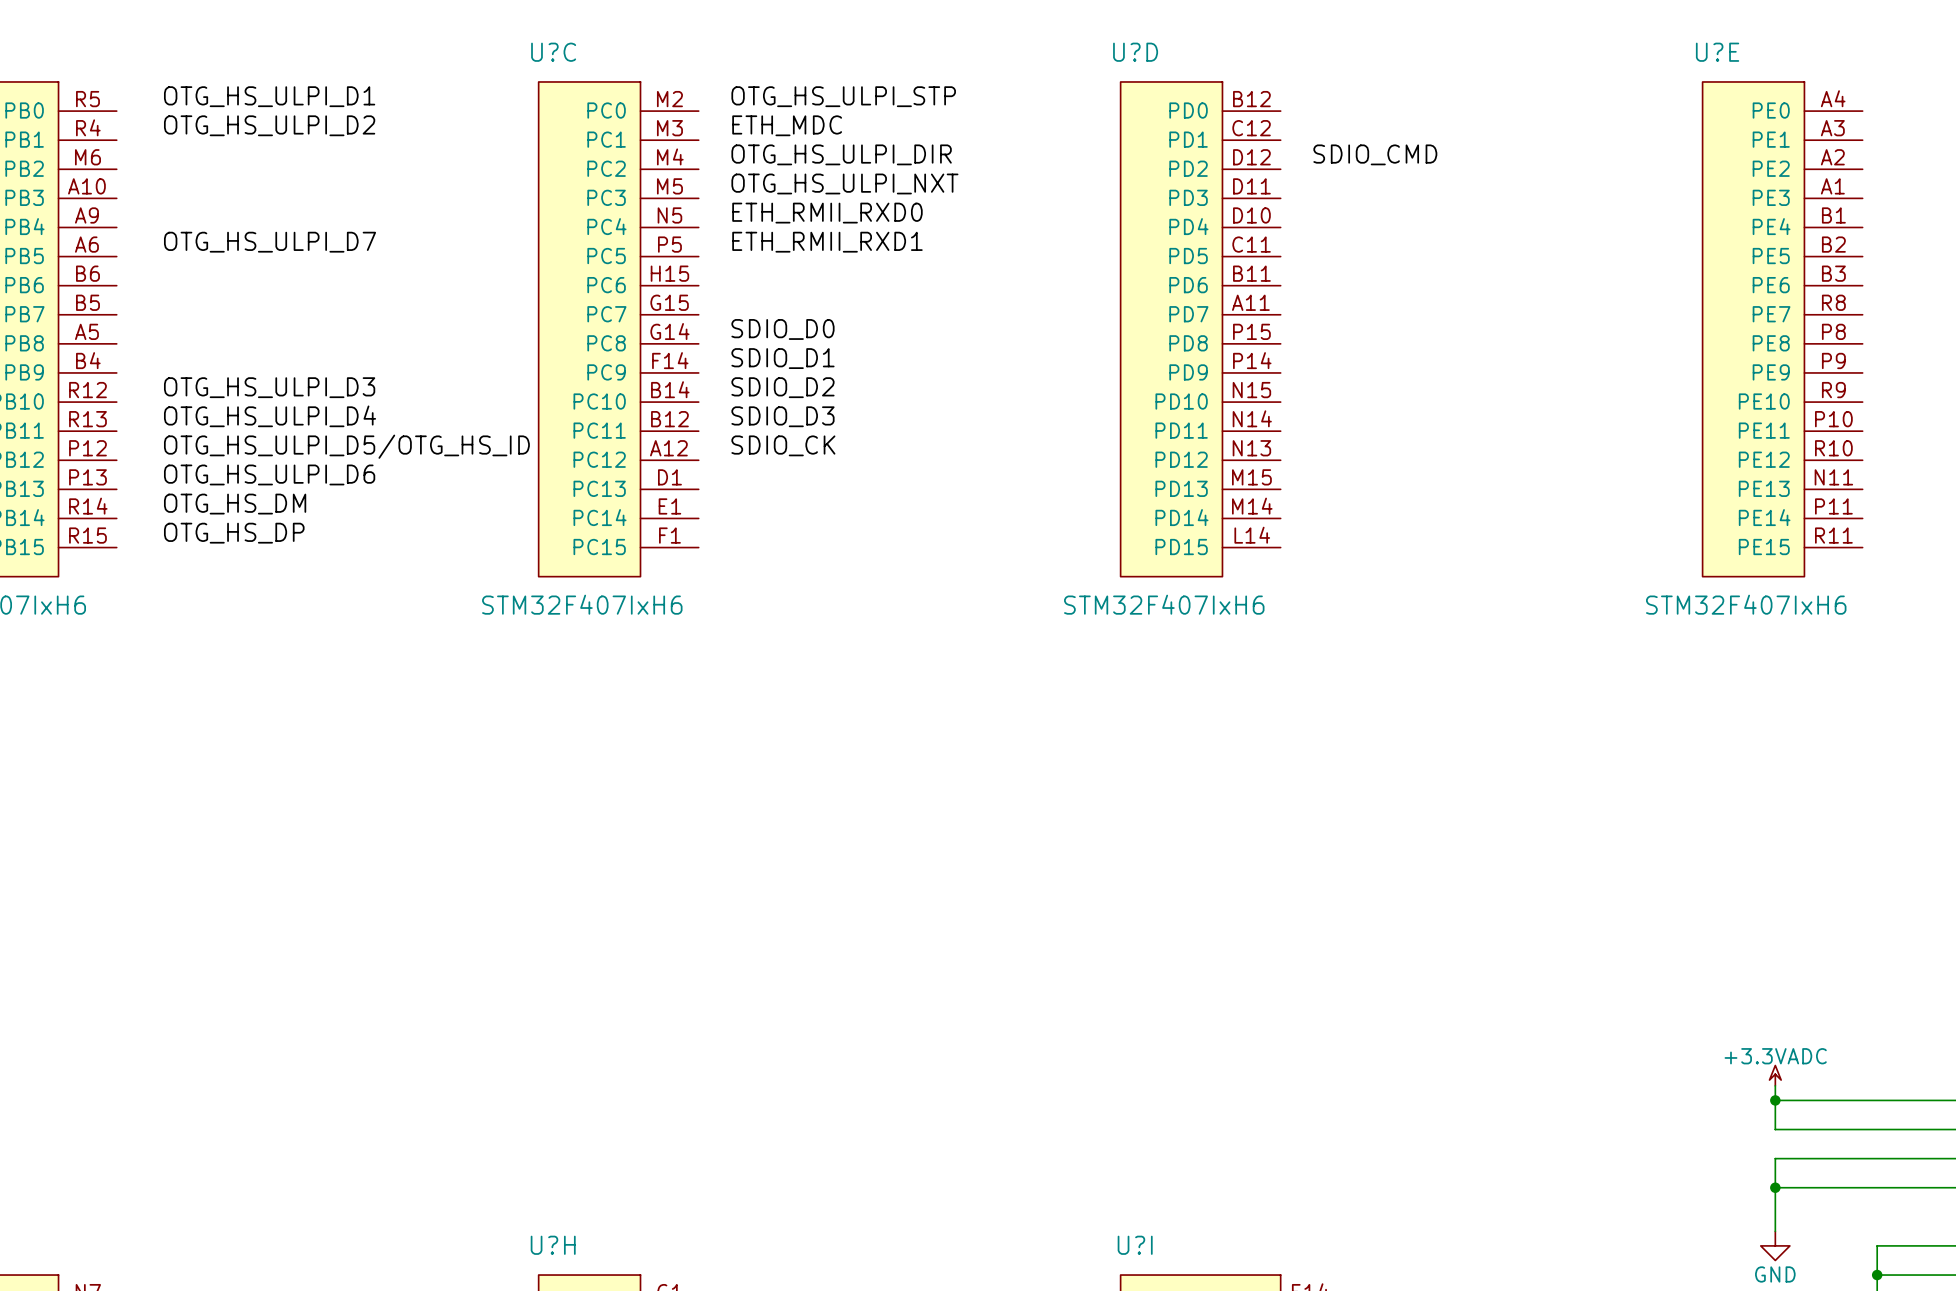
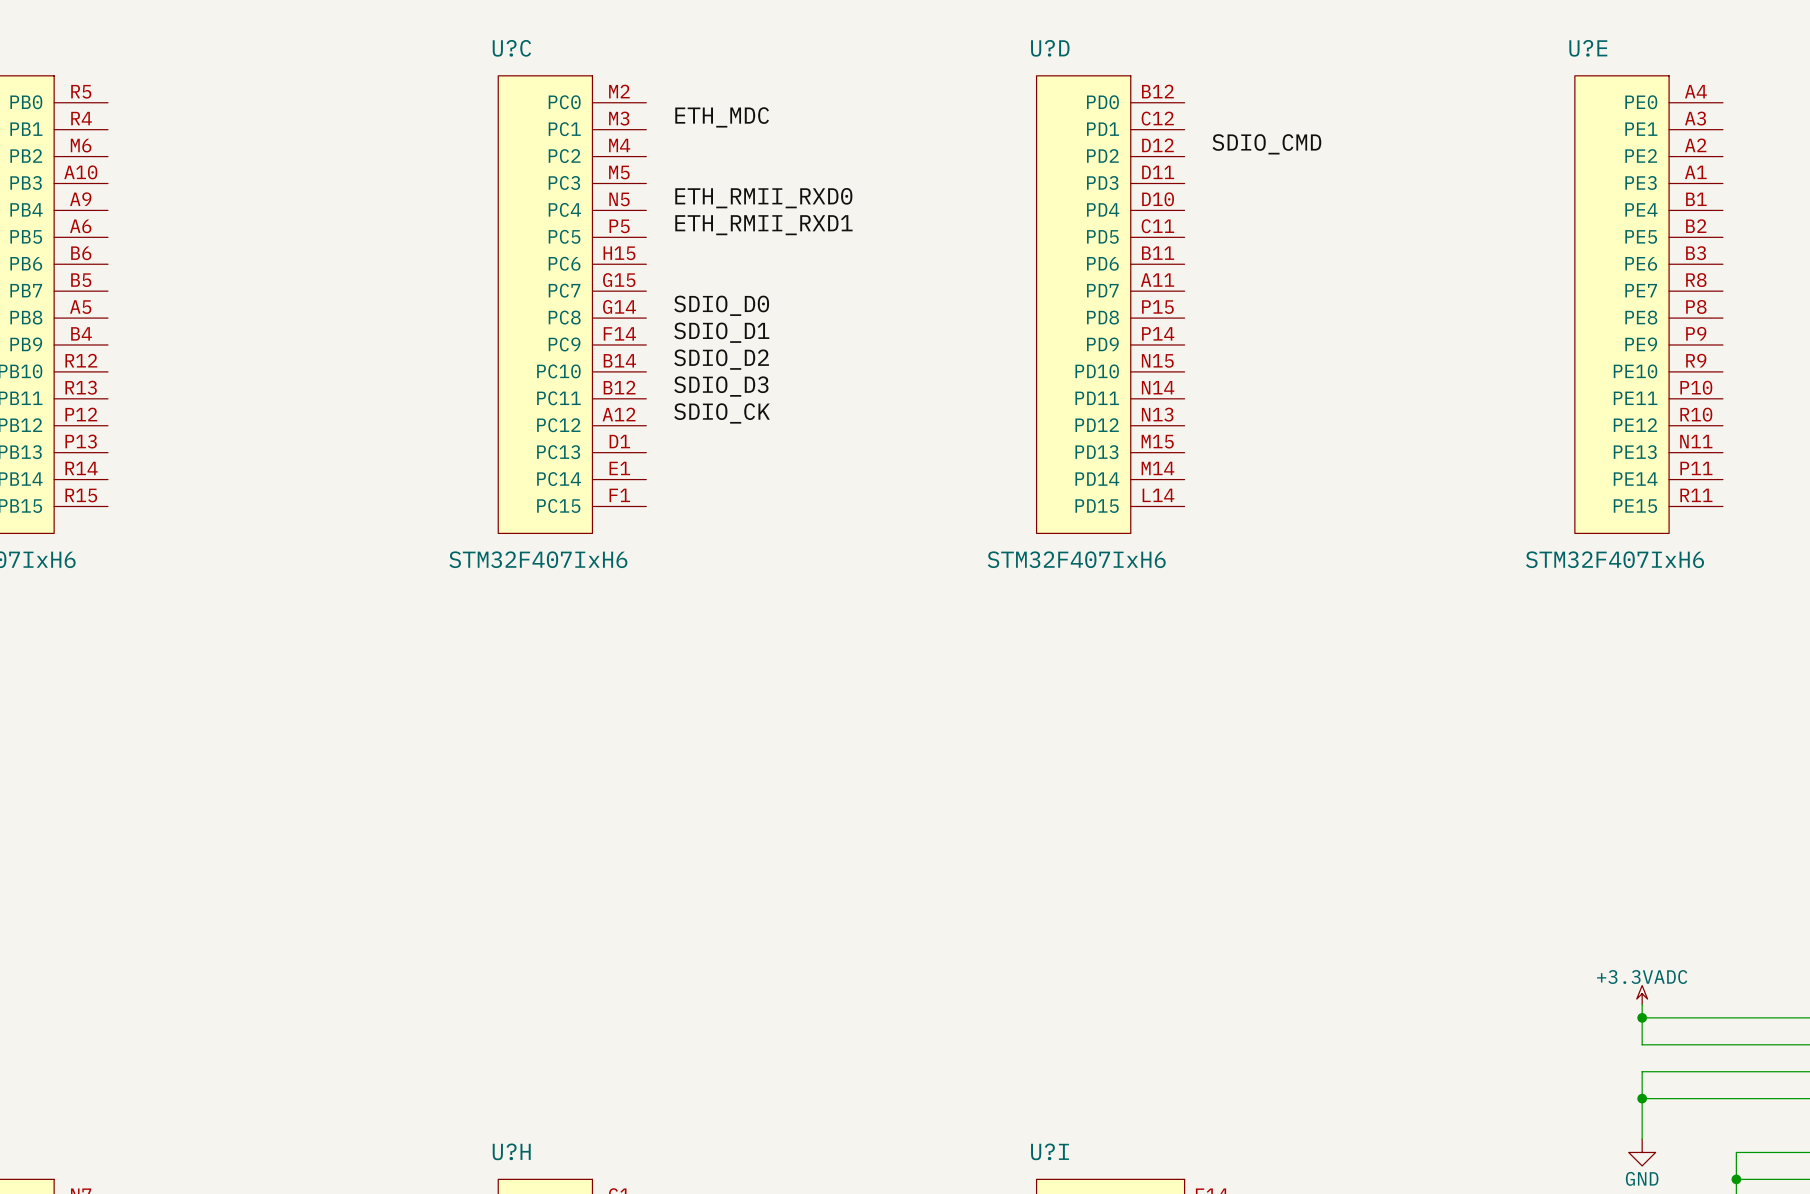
label: OTG_HS_ULPI_D1 (269, 96) -> none
label: OTG_HS_ULPI_STP (843, 96) -> none
label: OTG_HS_ULPI_D2 (269, 125) -> none
label: OTG_HS_ULPI_DIR (841, 154) -> none
label: OTG_HS_ULPI_NXT (844, 183) -> none
label: OTG_HS_ULPI_D7 (270, 242) -> none
label: OTG_HS_ULPI_D3 (269, 387) -> none
label: OTG_HS_ULPI_D4 (270, 416) -> none
label: OTG_HS_ULPI_D5/OTG_HS_ID (346, 446) -> none
label: OTG_HS_ULPI_D6 (269, 474) -> none
label: OTG_HS_DM (235, 504) -> none
label: OTG_HS_DP (234, 533) -> none

